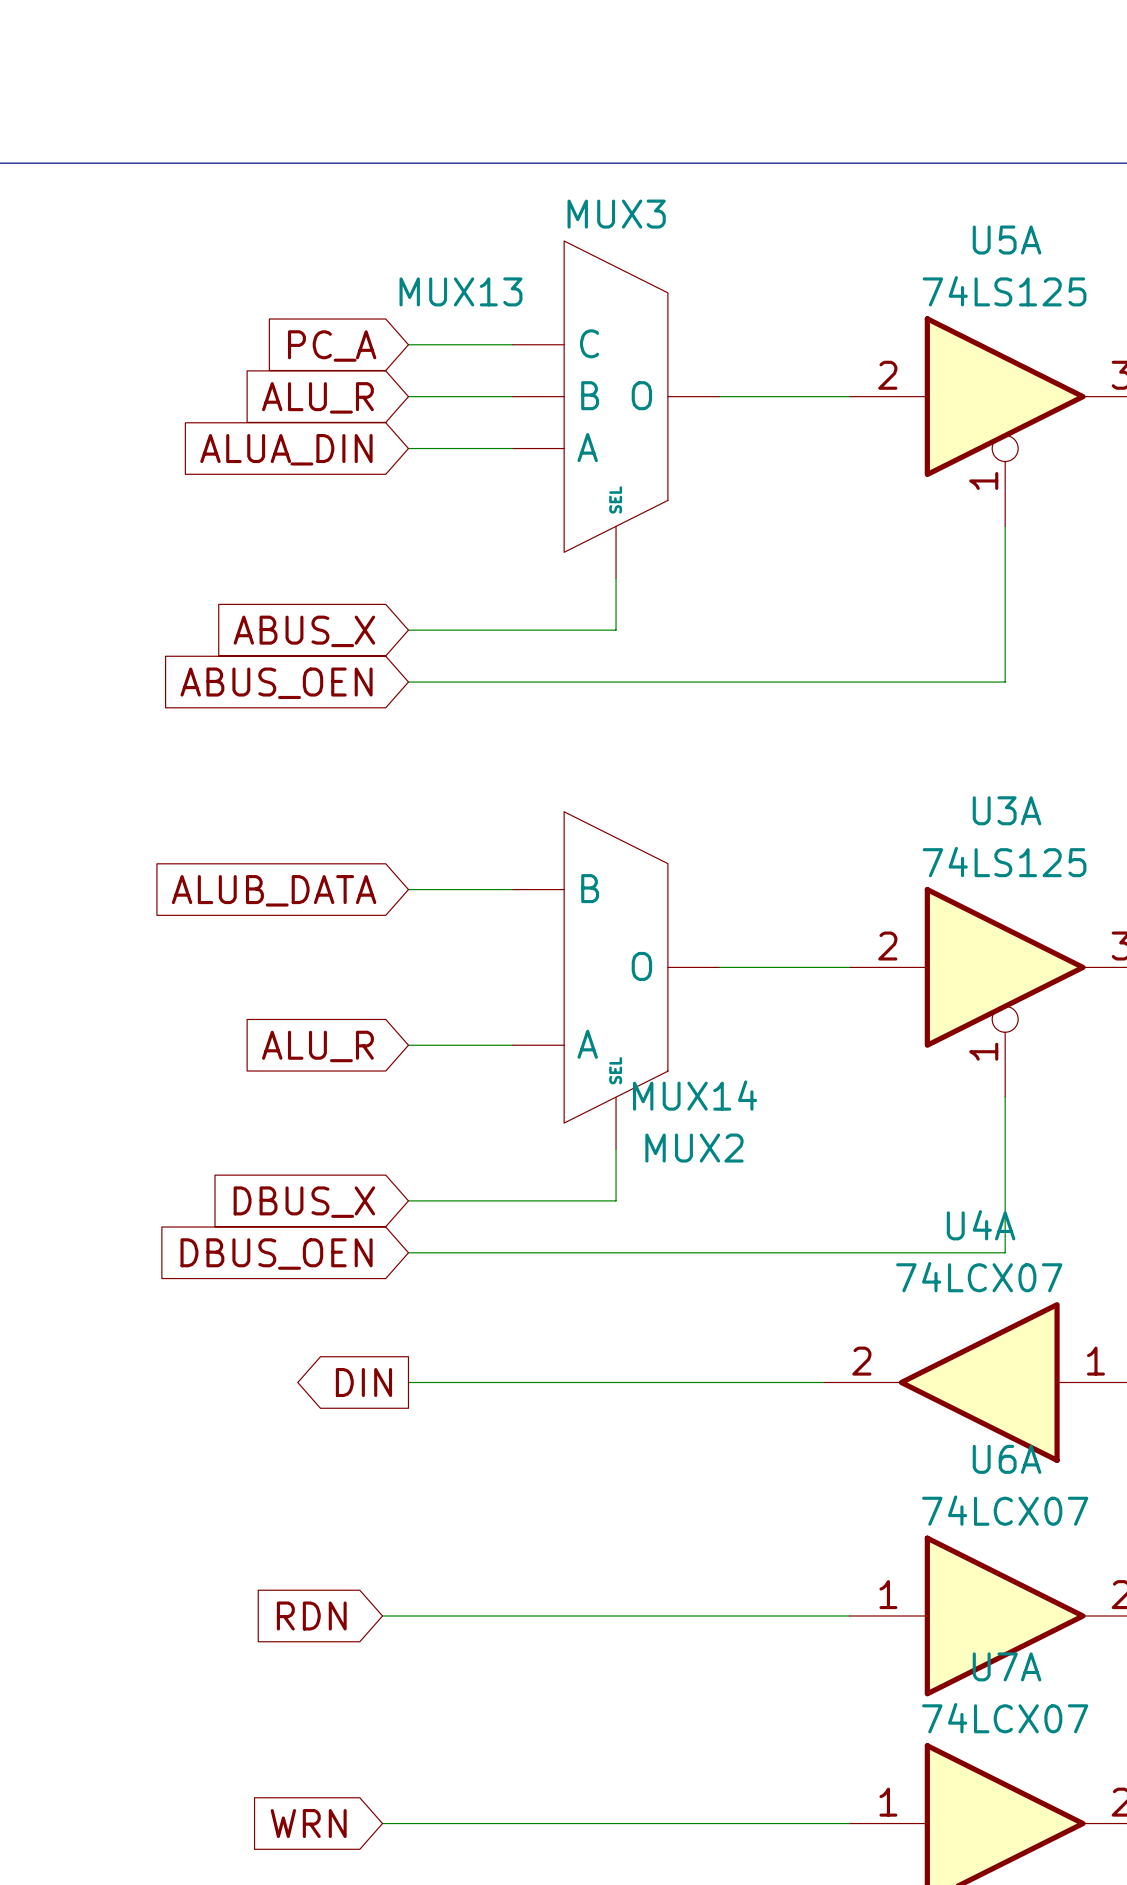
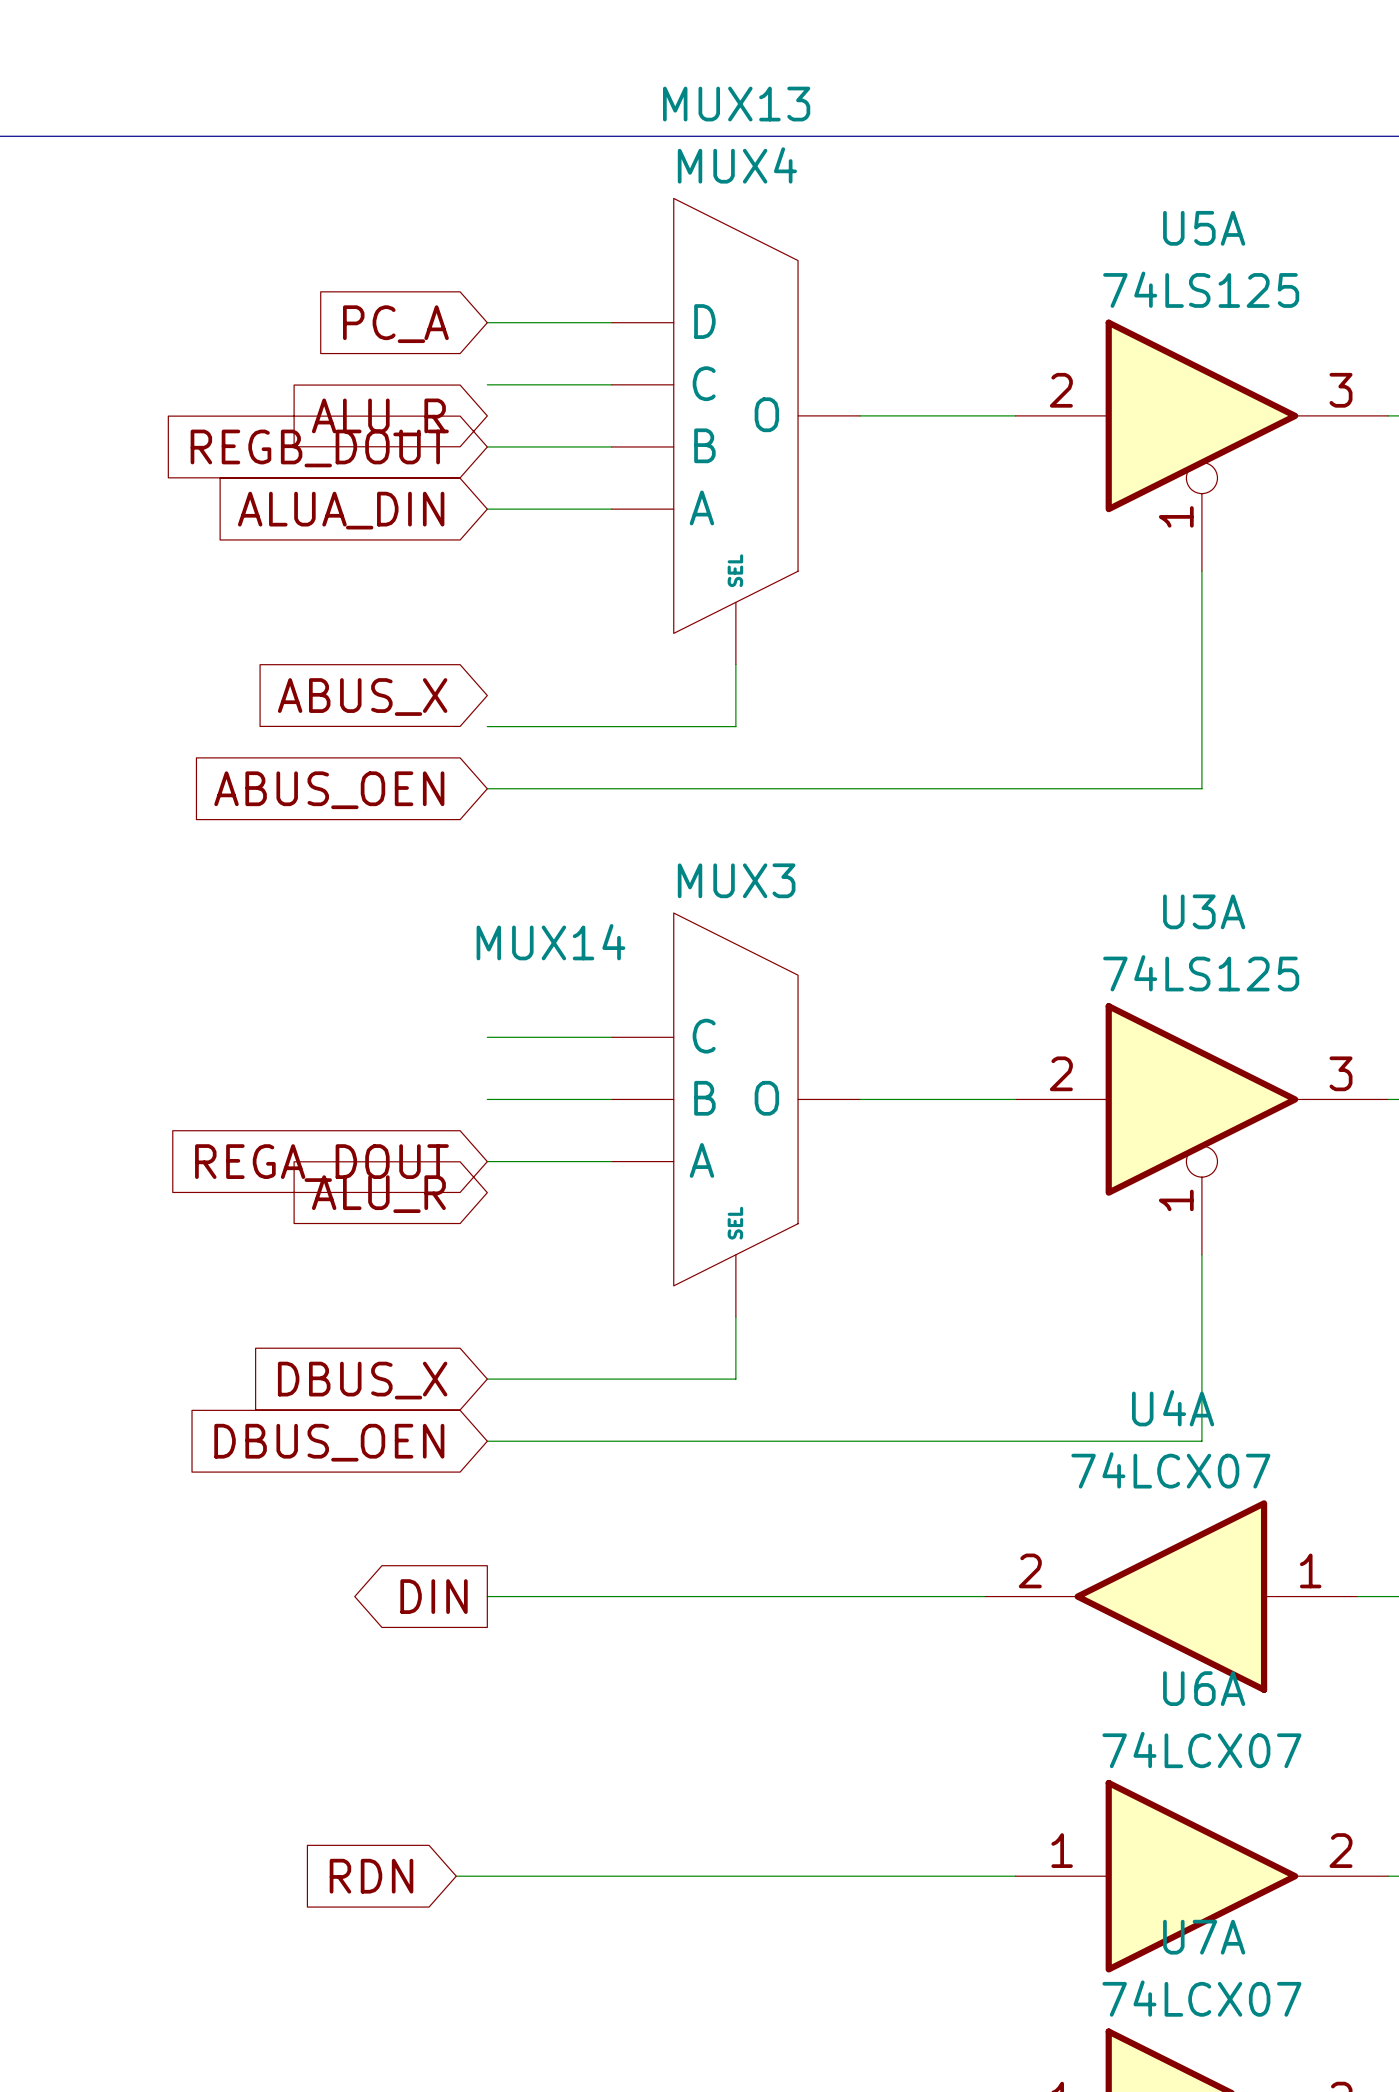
MUX13 value: MUX3 (616, 214) -> MUX4 (737, 165)
MUX13 symbol: [512, 240, 720, 579] -> [611, 198, 861, 665]
MUX13 name position: MUX13 (460, 291) -> MUX13 (736, 104)
wire: (408, 344) (512, 344) -> (487, 322) (611, 322)
global label position: PC_A (332, 346) -> PC_A (395, 324)
wire: (408, 396) (512, 396) -> (487, 384) (611, 384)
global label: none -> REGB_DOUT (319, 448)
wire: (408, 448) (512, 448) -> (487, 446) (611, 446)
global label position: ALUA_DIN (286, 449) -> ALUA_DIN (341, 510)
wire: none -> (487, 509) (611, 509)
wire: (408, 630) (616, 630) -> (487, 726) (735, 726) (735, 695)
wire: (408, 682) (1005, 682) -> (487, 788) (1201, 788) (1201, 757)
global label position: ABUS_OEN (276, 683) -> ABUS_OEN (329, 790)
MUX14 symbol: [512, 811, 720, 1150] -> [611, 913, 861, 1317]
wire: (408, 889) (512, 889) -> (487, 1037) (611, 1037)
global label: ALUB_DATA (274, 890) -> none
wire: none -> (487, 1099) (611, 1099)
global label: none -> REGA_DOUT (321, 1163)
wire: (408, 1045) (512, 1045) -> (487, 1161) (611, 1161)
MUX14 name position: MUX14 (695, 1095) -> MUX14 (550, 942)
MUX14 value: MUX2 (694, 1148) -> MUX3 (736, 880)

